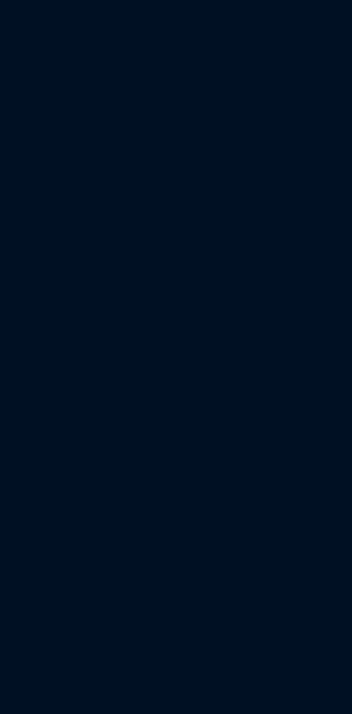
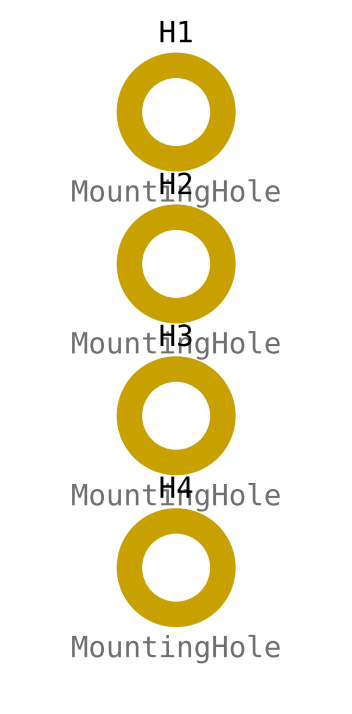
H1: none -> MountingHole (176, 112)
H2: none -> MountingHole (176, 263)
H3: none -> MountingHole (176, 415)
H4: none -> MountingHole (176, 567)

